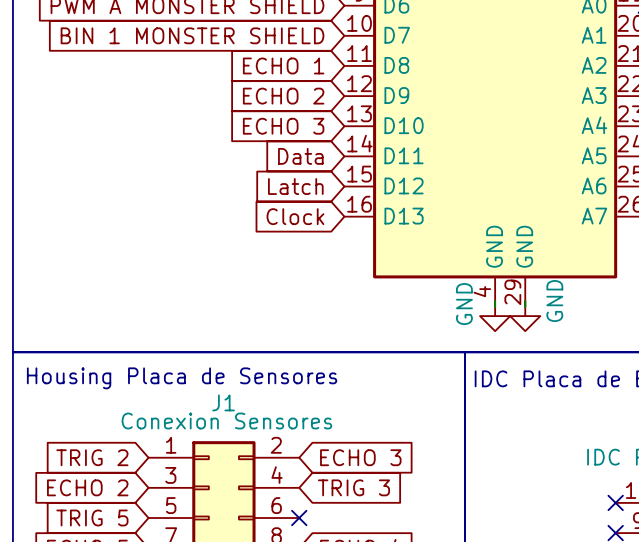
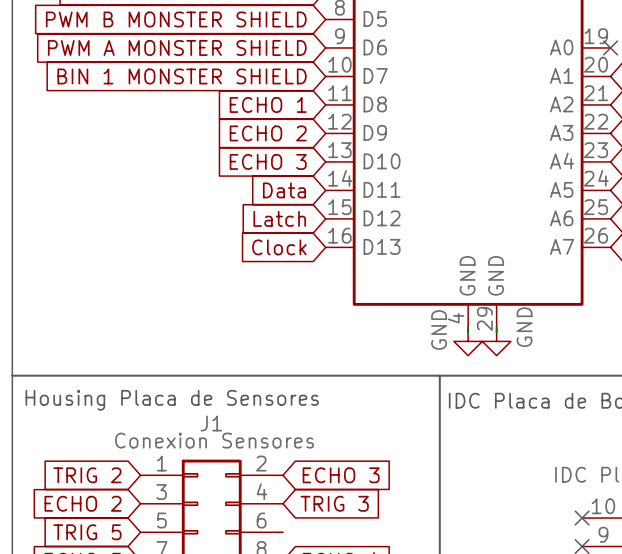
no-connect mark: (299, 518) -> none

